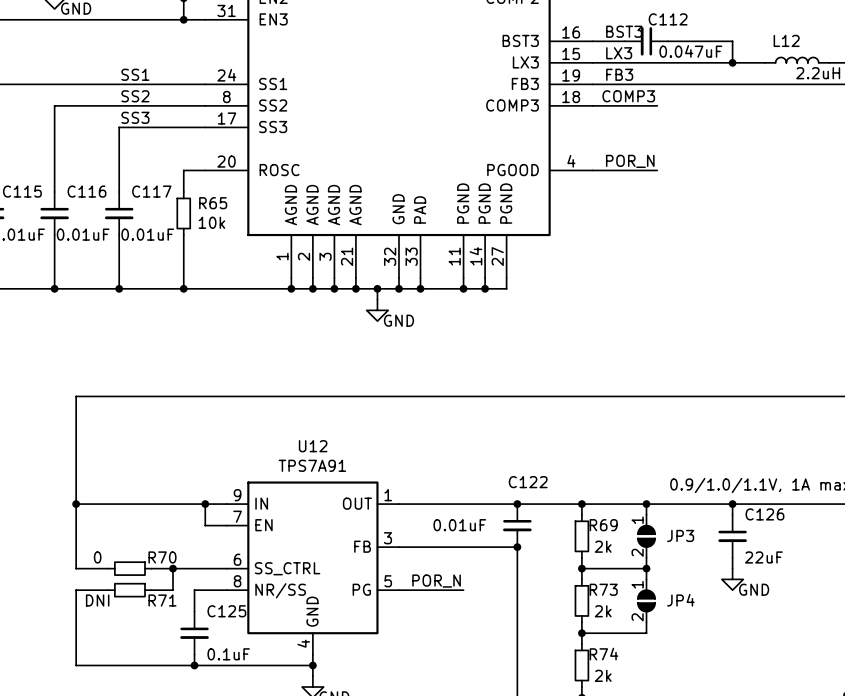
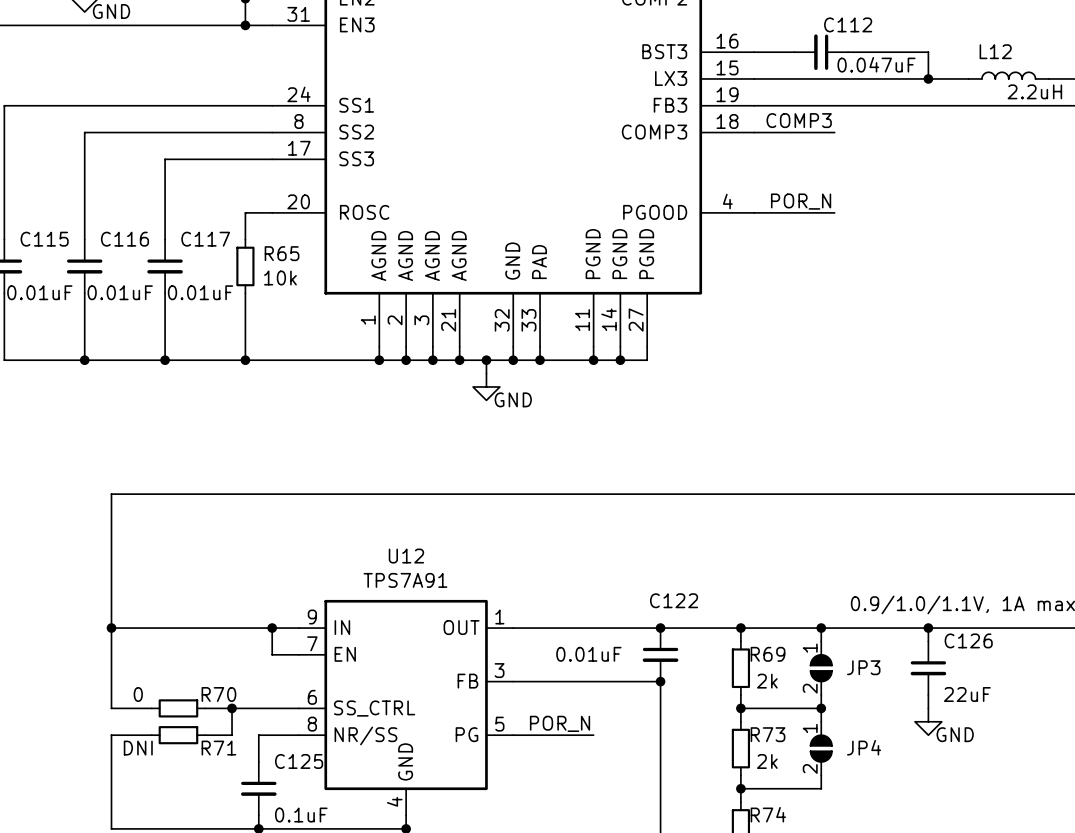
label: BST3 (624, 31) -> none
label: LX3 (619, 53) -> none
label: SS1 (135, 74) -> none
label: FB3 (619, 74) -> none
label: SS2 (135, 96) -> none
label: SS3 (135, 117) -> none

